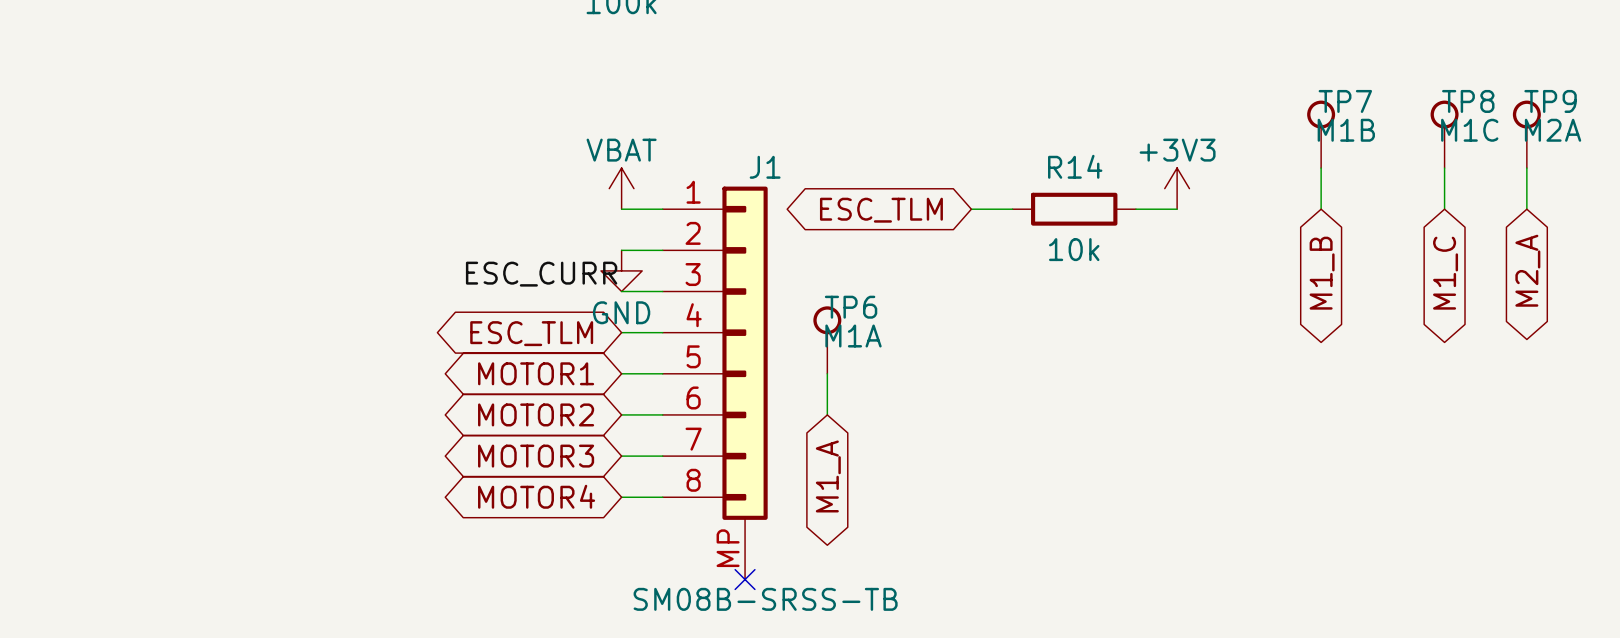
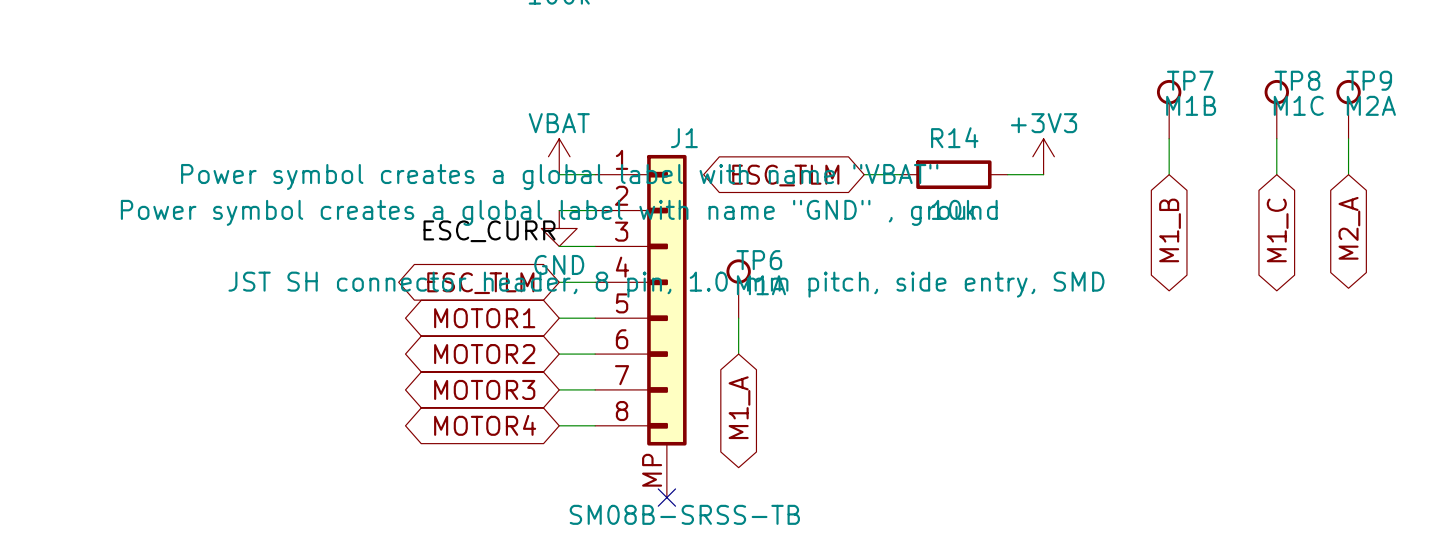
power symbol text: none -> Power symbol creates a global label with name "VBAT" (559, 177)
power symbol text: none -> Power symbol creates a global label with name "GND" , ground (559, 212)
J1 text: none -> JST SH connector header, 8 pin, 1.0 mm pitch, side entry, SMD (666, 284)

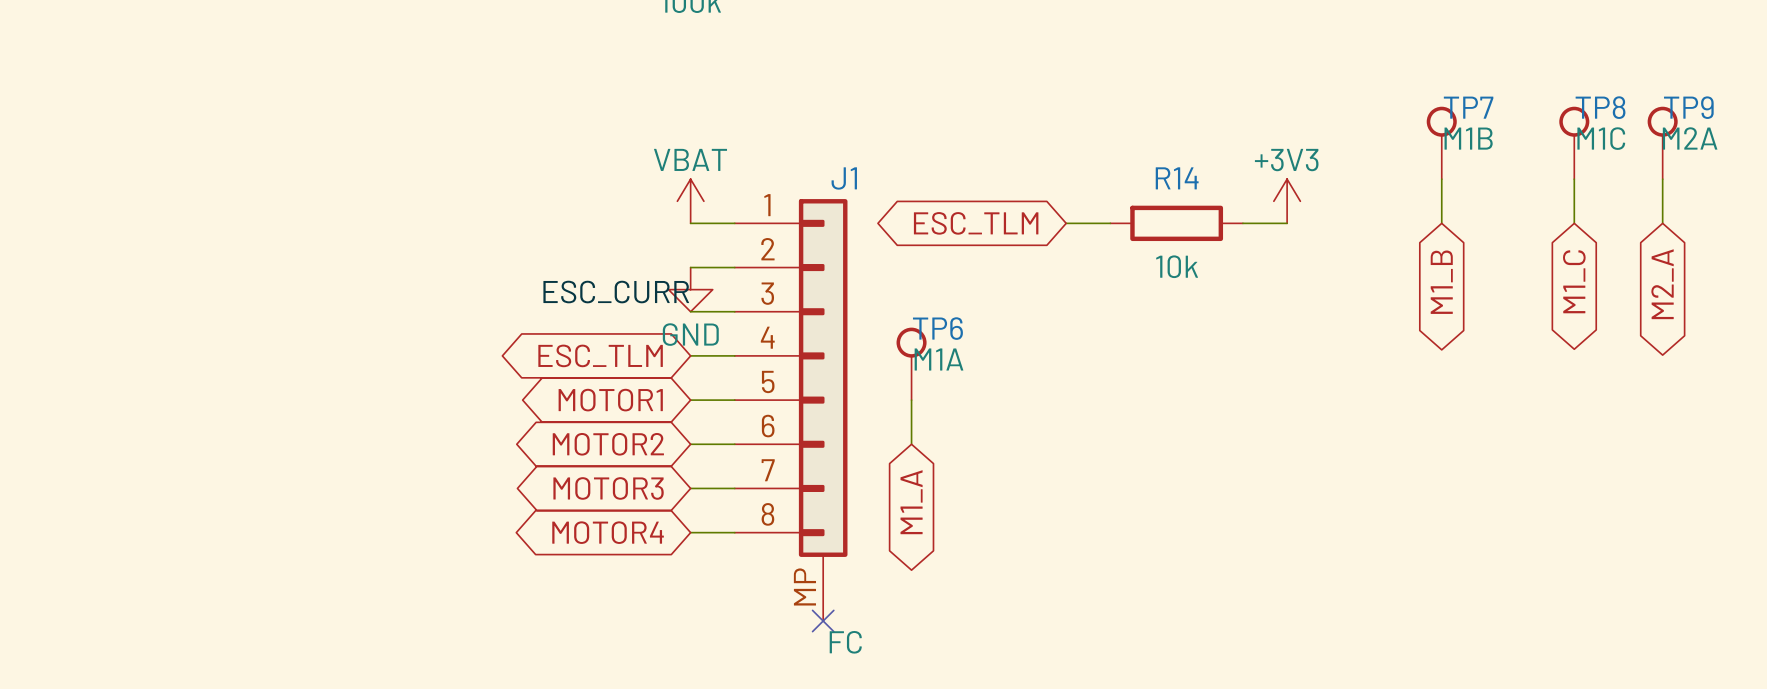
power symbol text: Power symbol creates a global label with name "VBAT" (559, 177) -> none
power symbol text: Power symbol creates a global label with name "GND" , ground (559, 212) -> none
J1 text: JST SH connector header, 8 pin, 1.0 mm pitch, side entry, SMD (666, 284) -> none
J1 value: SM08B-SRSS-TB (684, 514) -> FC (845, 642)

